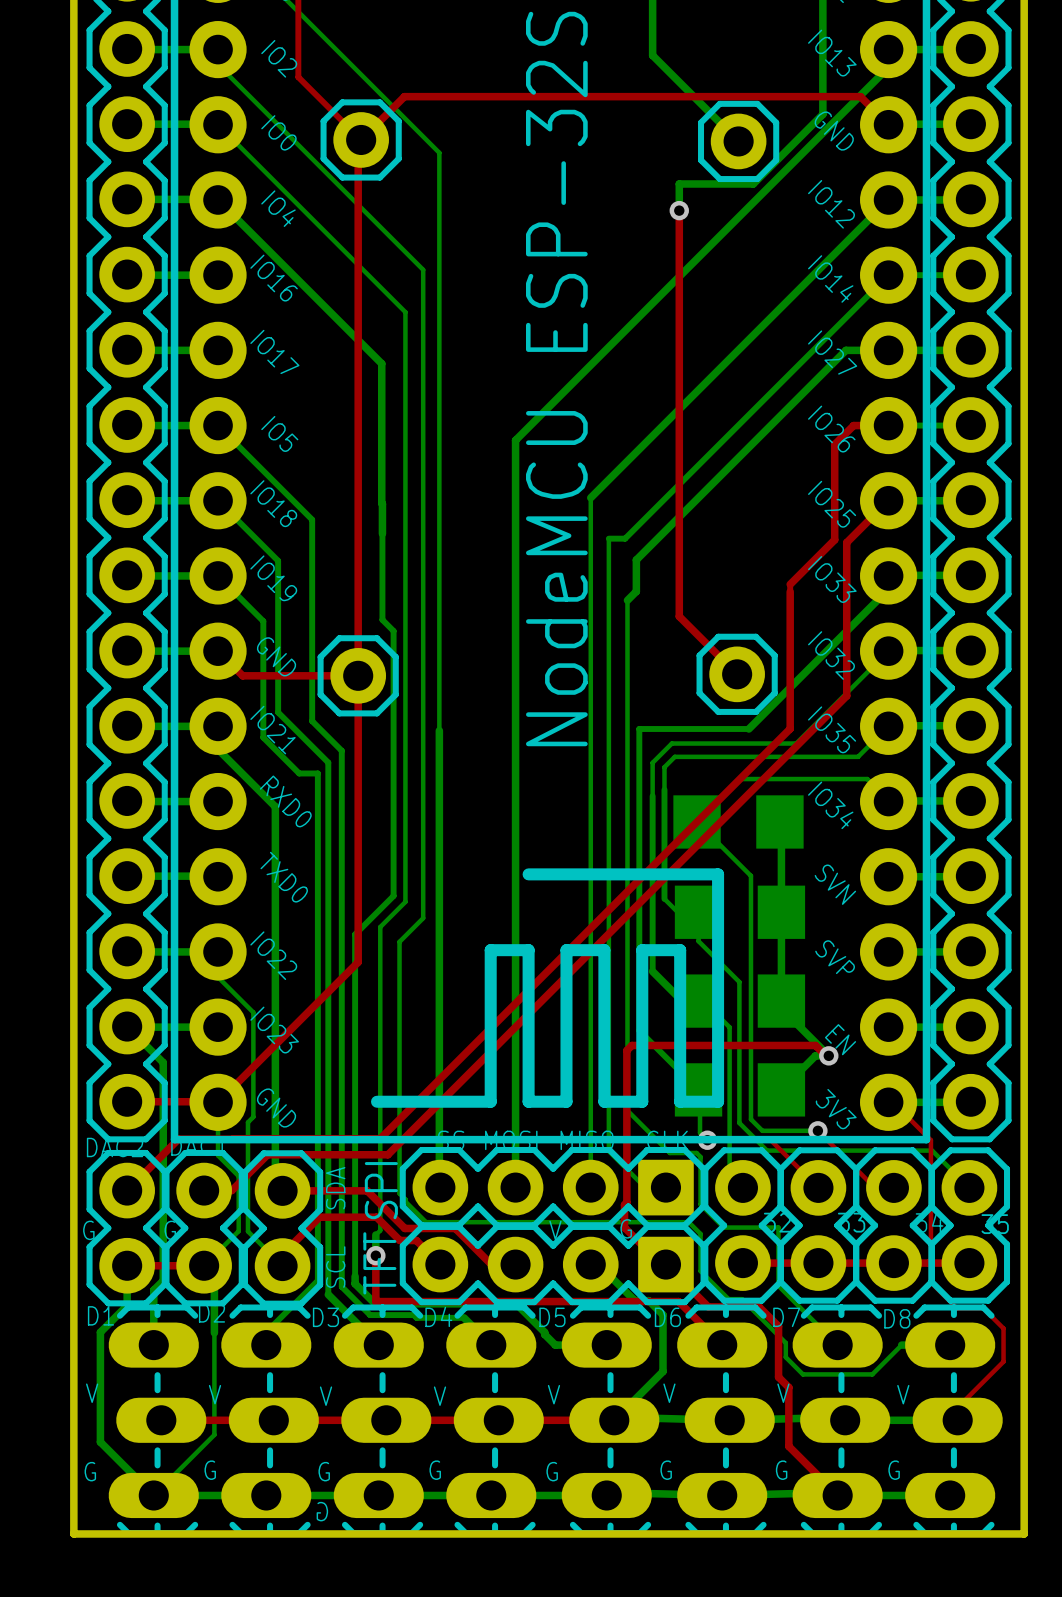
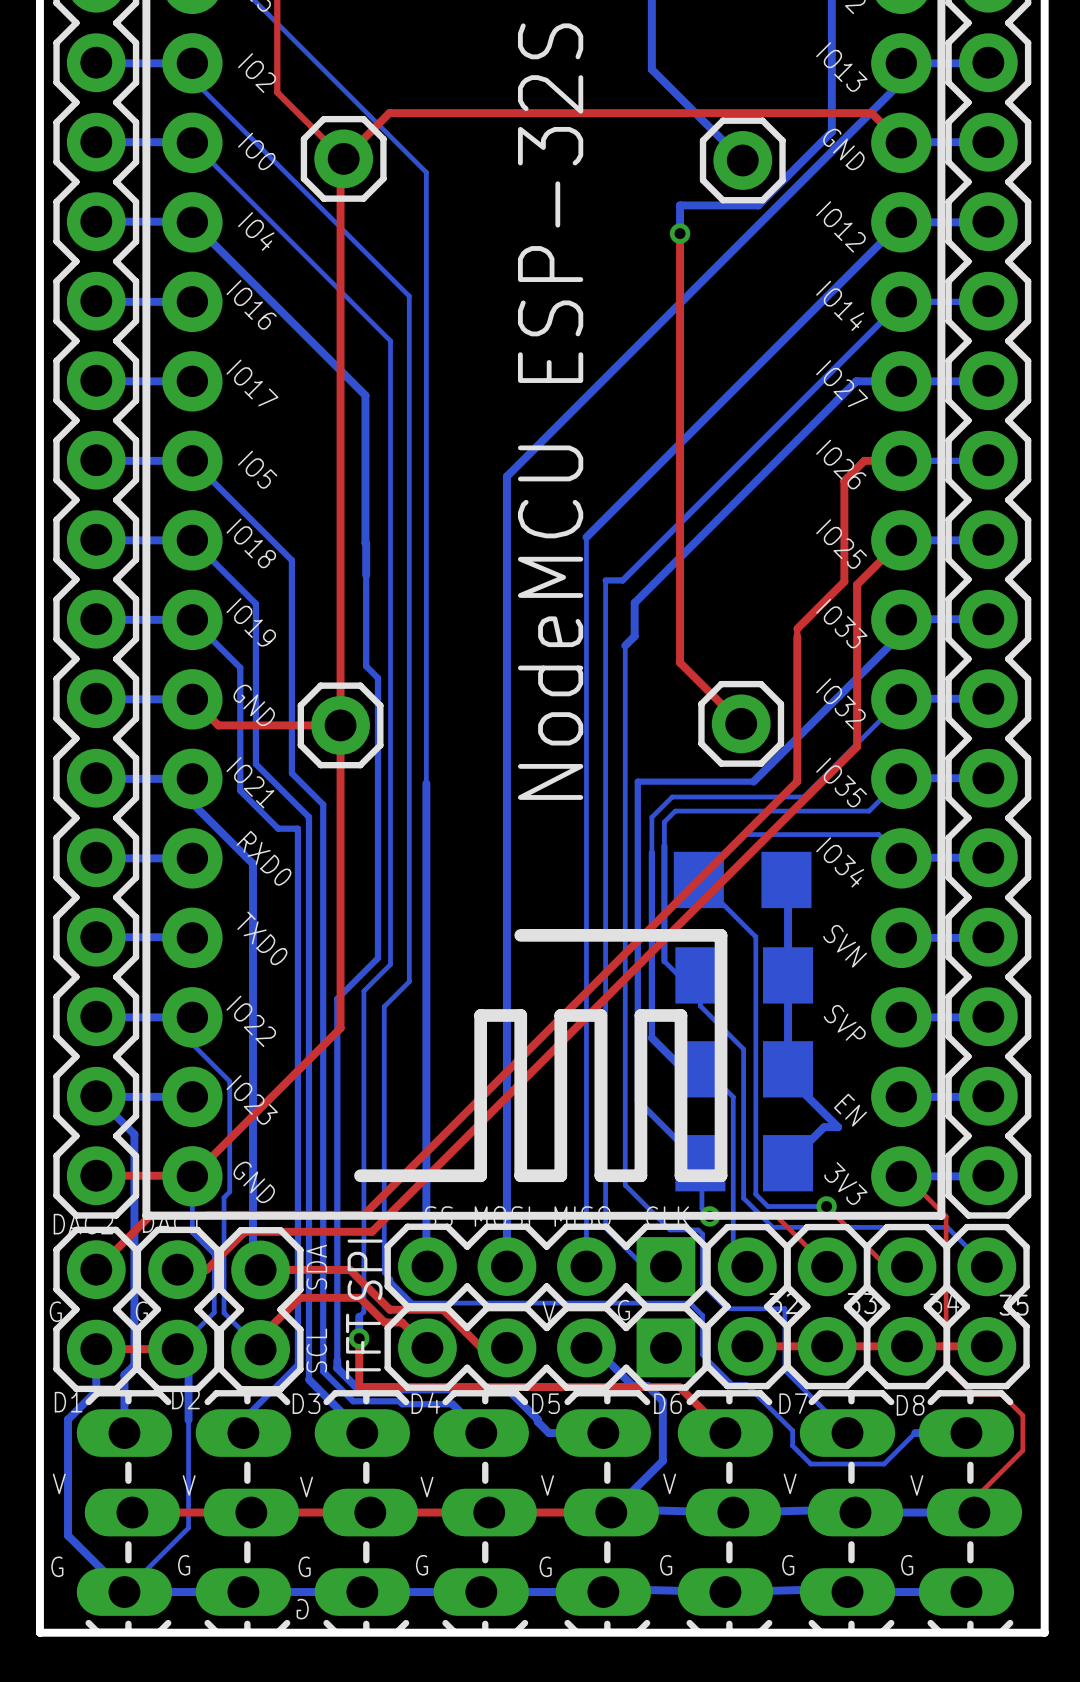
top track: (828, 1055) (822, 1055) (822, 1052) (815, 1045) (631, 1045) (626, 1050) (626, 1202) (624, 1204) (624, 1227) (661, 1264) (665, 1264) (708, 1306) (759, 1306) (778, 1326) (778, 1377) (788, 1387) (788, 1446) (837, 1495) -> none
via: (828, 1055) -> none

